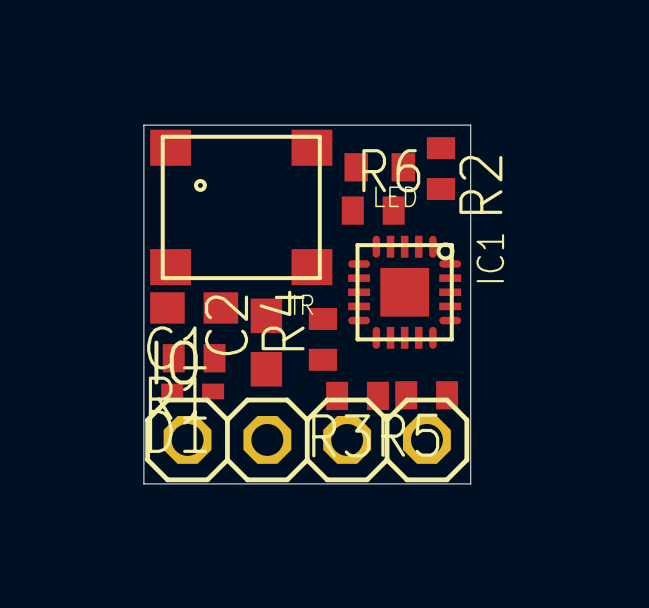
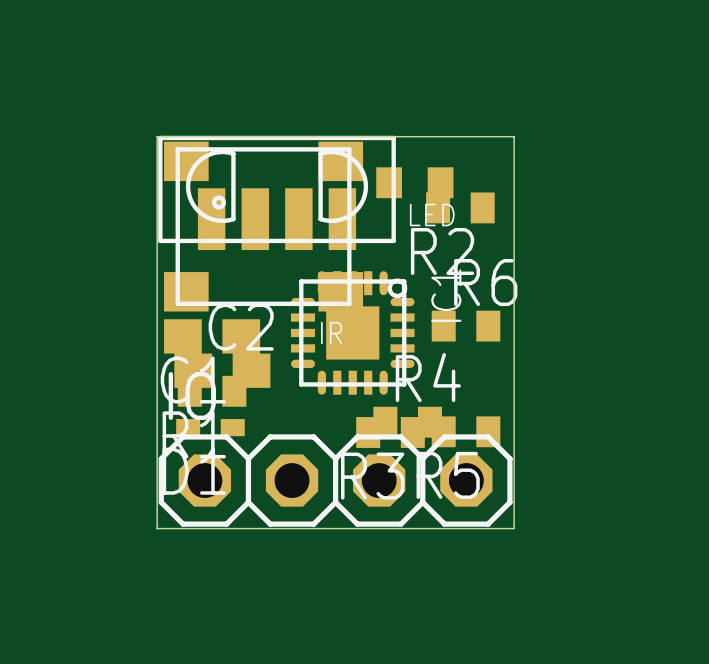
R2 rotation: 0° (440, 168) -> 90° clockwise (460, 207)
part: none -> (277, 192)
R6 position: (373, 210) -> (466, 326)
IC1 position: (404, 292) -> (352, 332)
R4 rotation: 0° (322, 339) -> 90° clockwise (407, 422)
R4 position: (322, 339) -> (407, 422)
C2 rotation: 0° (266, 342) -> 90° clockwise (222, 370)
C2 position: (266, 342) -> (222, 370)

